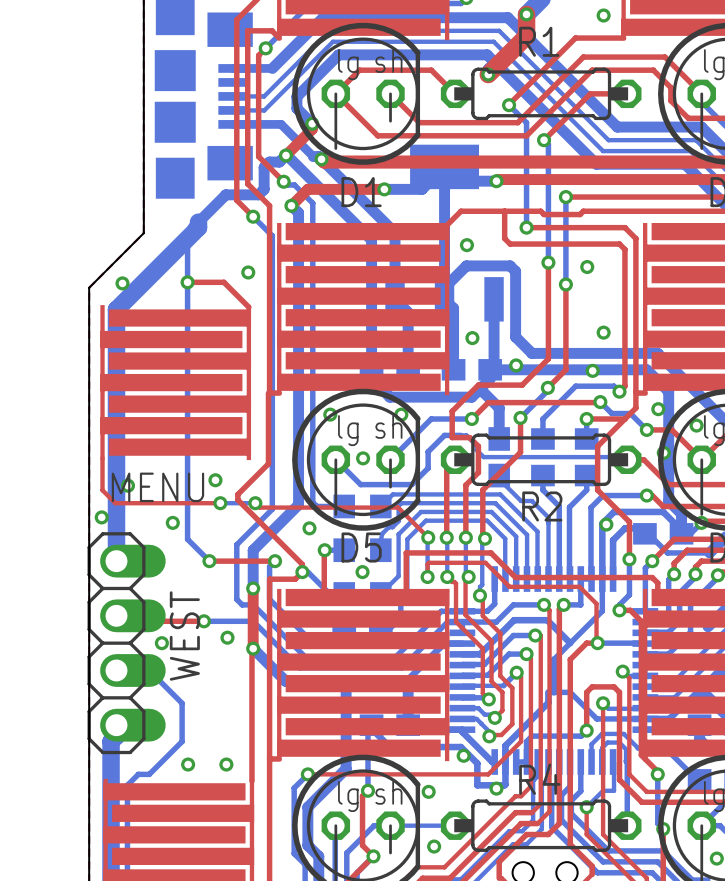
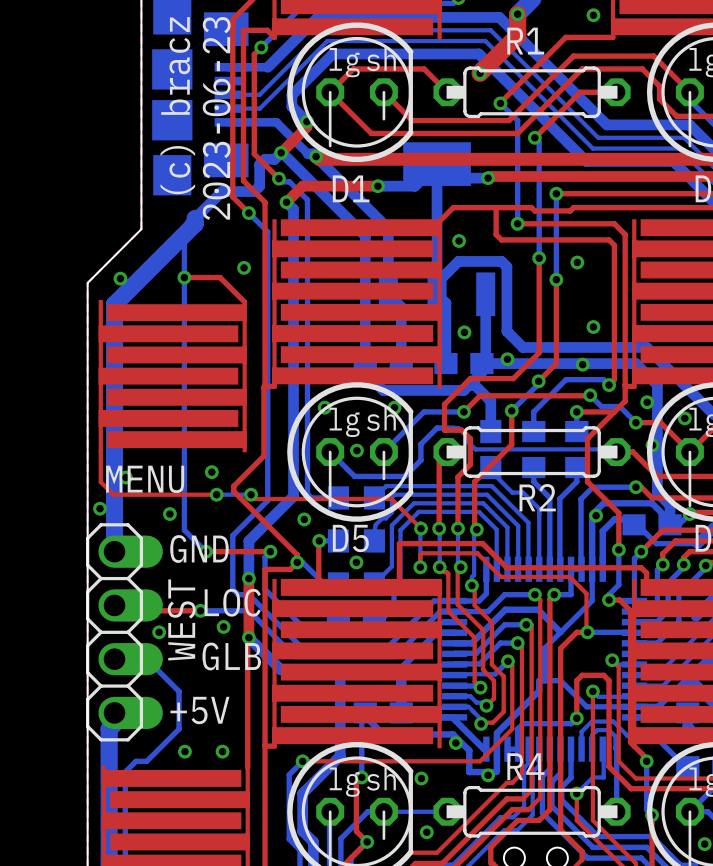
text: none -> (c) bracz (177, 105)
text: none -> 2023-06-23 (216, 118)
text: none -> GND (199, 549)
text: none -> LOC (232, 602)
text: none -> GLB (231, 656)
text: none -> +5V (199, 710)

